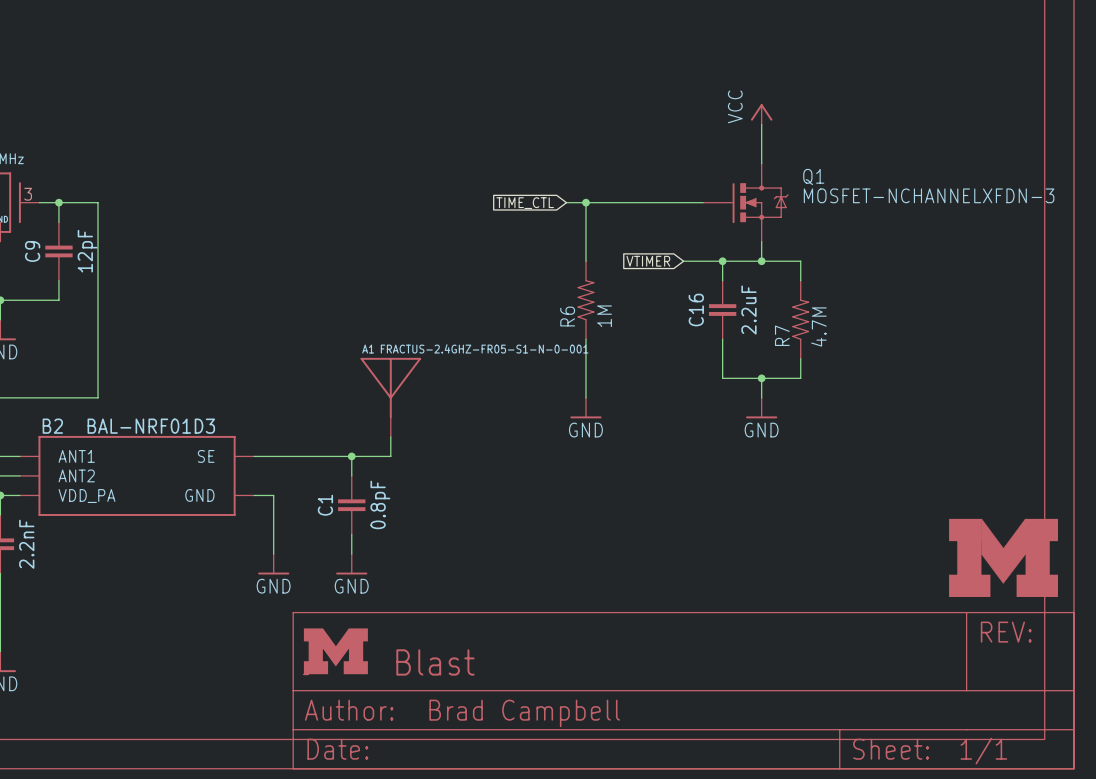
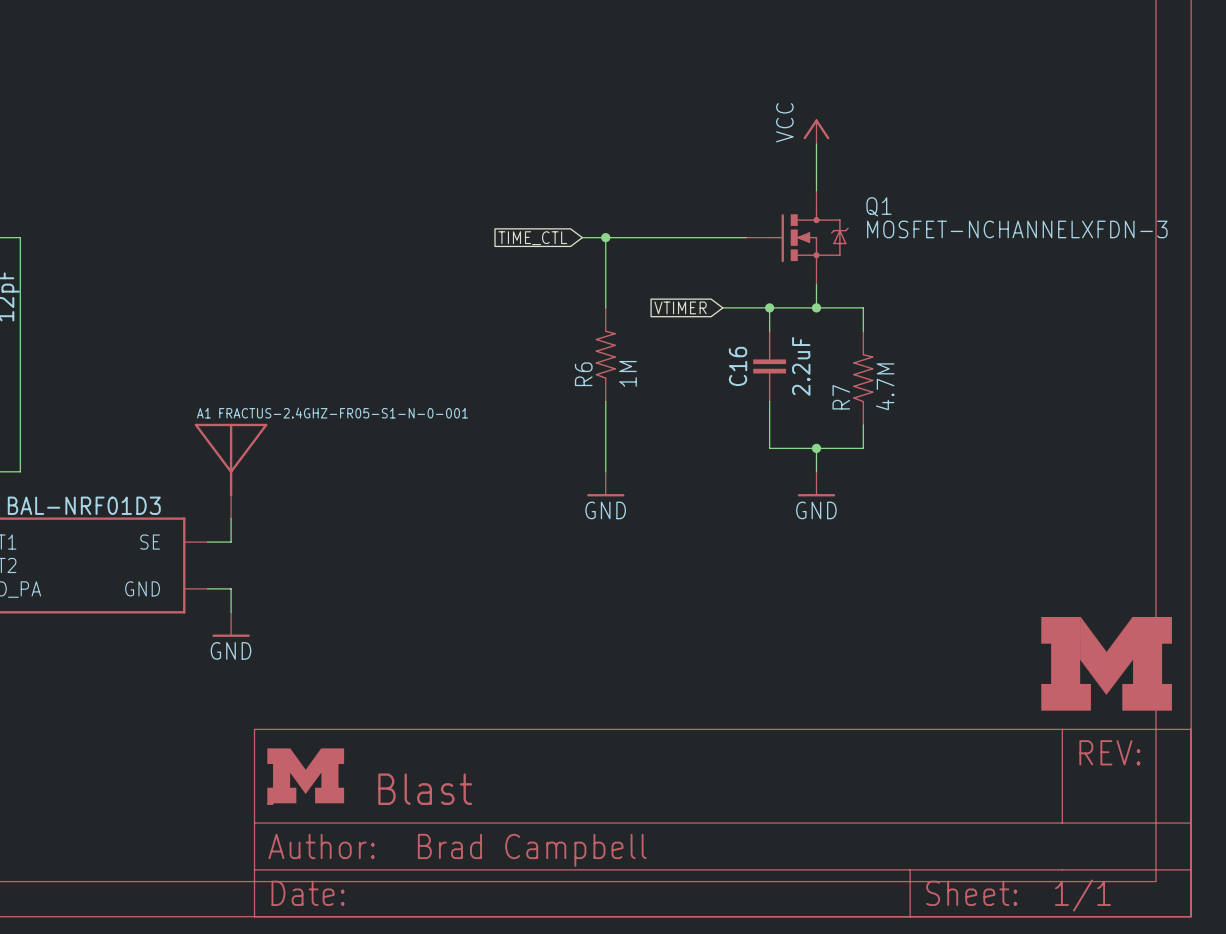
A1 position: (390, 397) -> (231, 471)
wire: (390, 436) (390, 456) (273, 456) -> (231, 518) (231, 542)
wire: (351, 456) (351, 475) -> none
junction: (351, 456) -> none
C1: 0.8pF (351, 505) -> none
wire: (351, 534) (351, 554) -> none
power symbol position: GND (273, 564) -> GND (231, 624)
power symbol: GND (351, 564) -> none

